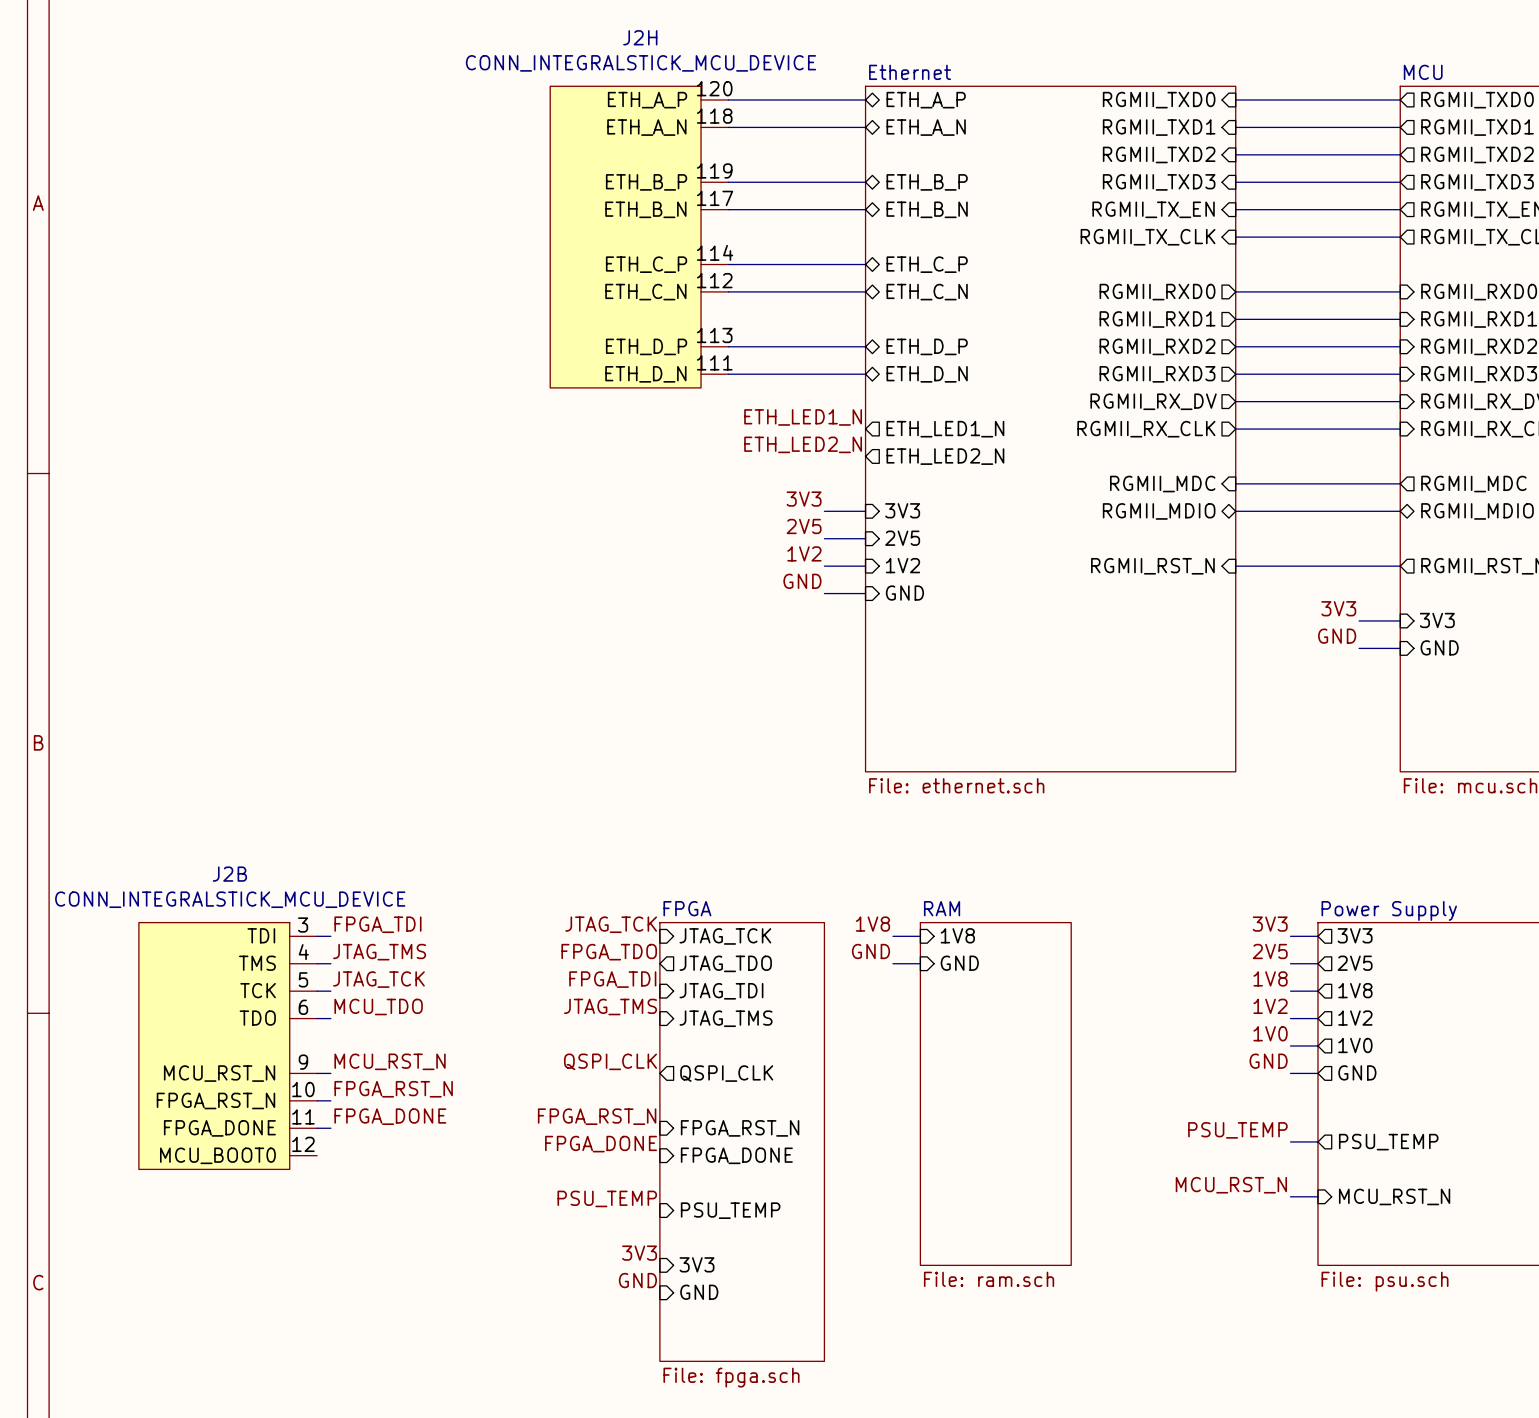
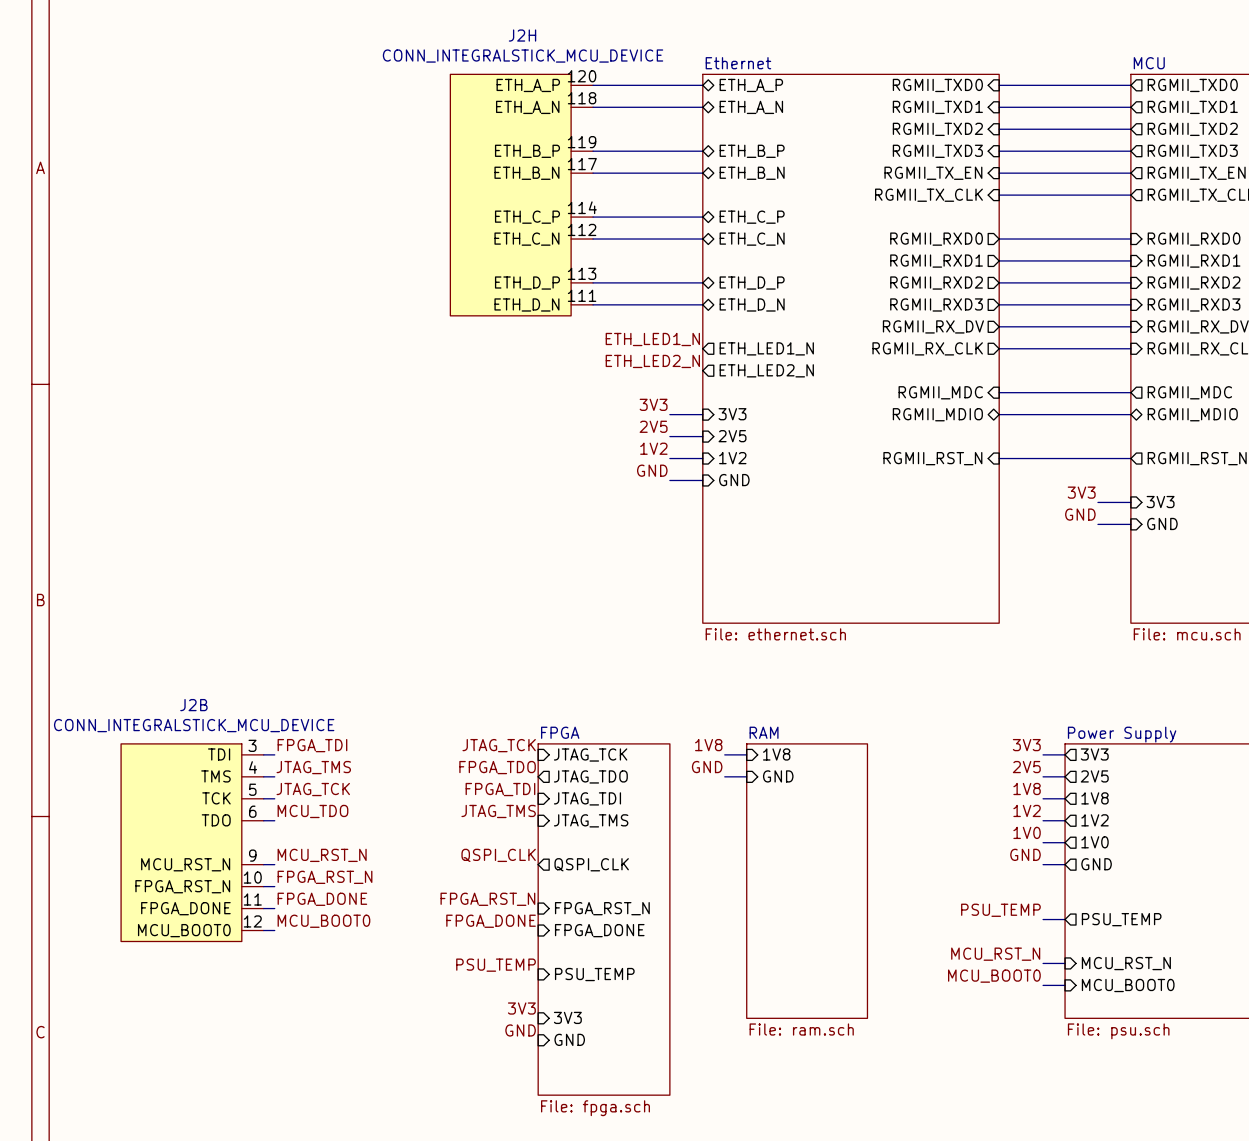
label: none -> MCU_BOOT0 (323, 921)
wire: none -> (263, 930) (274, 930)
label: none -> MCU_BOOT0 (994, 976)
wire: none -> (1043, 985) (1065, 985)
sheet pin: none -> MCU_BOOT0 (1128, 985)

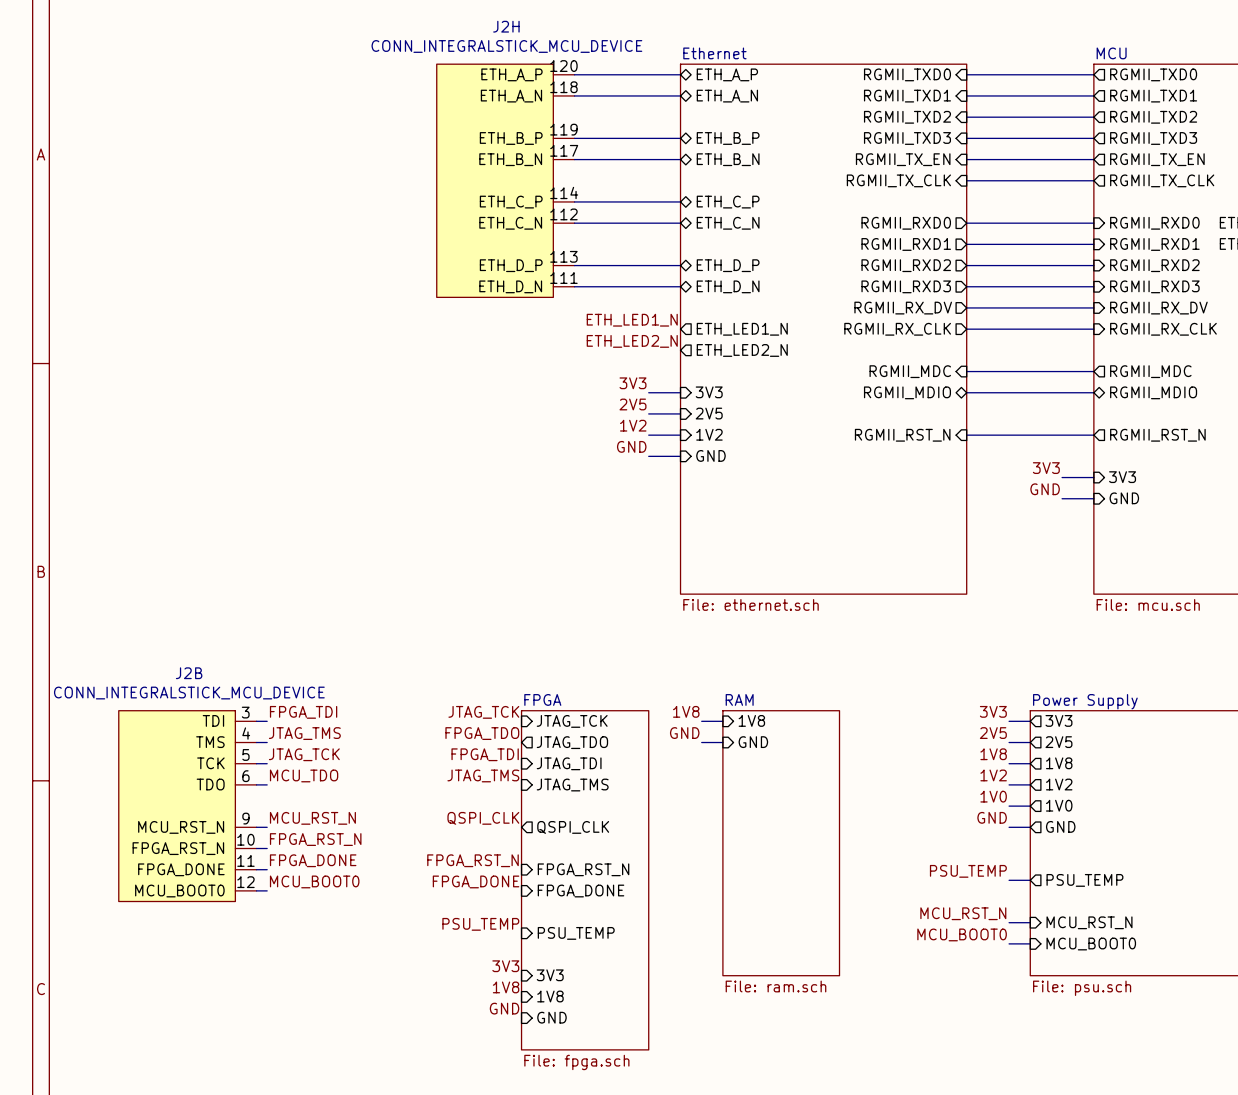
label: GND (520, 1030) -> 1V8 (506, 987)
sheet pin: GND (569, 1039) -> 1V8 (550, 996)
label: none -> GND (504, 1008)
sheet pin: none -> GND (551, 1017)

